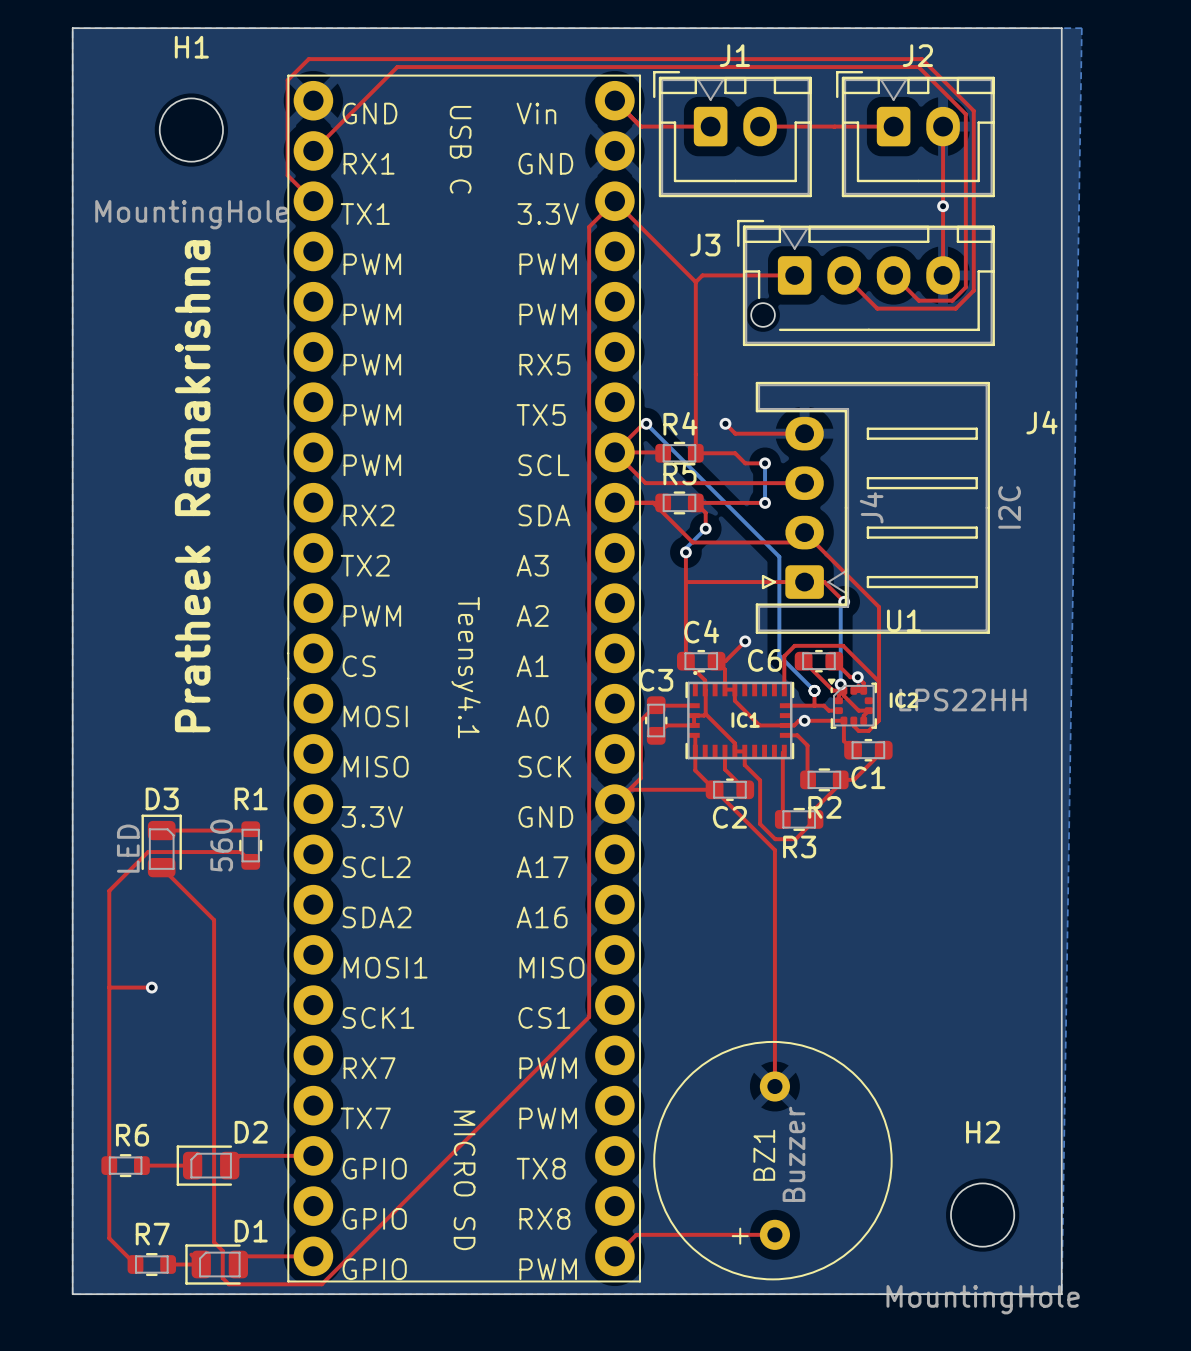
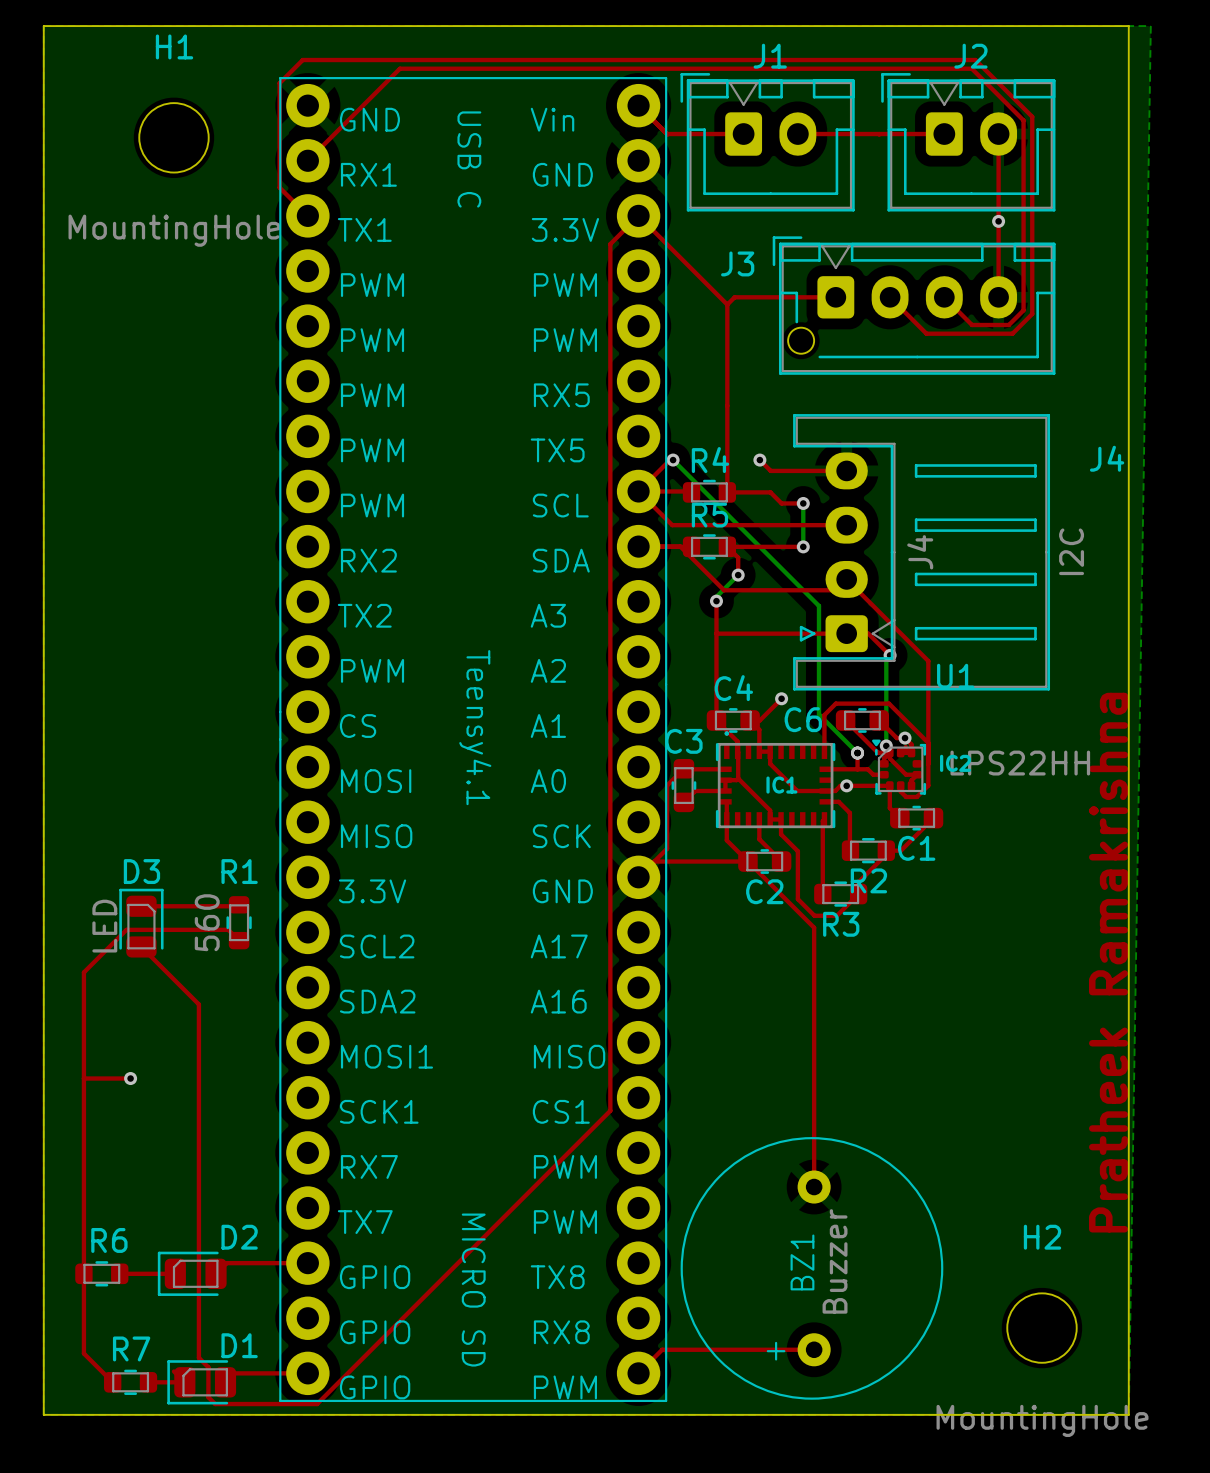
text: Pratheek Ramakrishna (192, 486) -> none
text: none -> Pratheek Ramakrishna (1108, 962)

